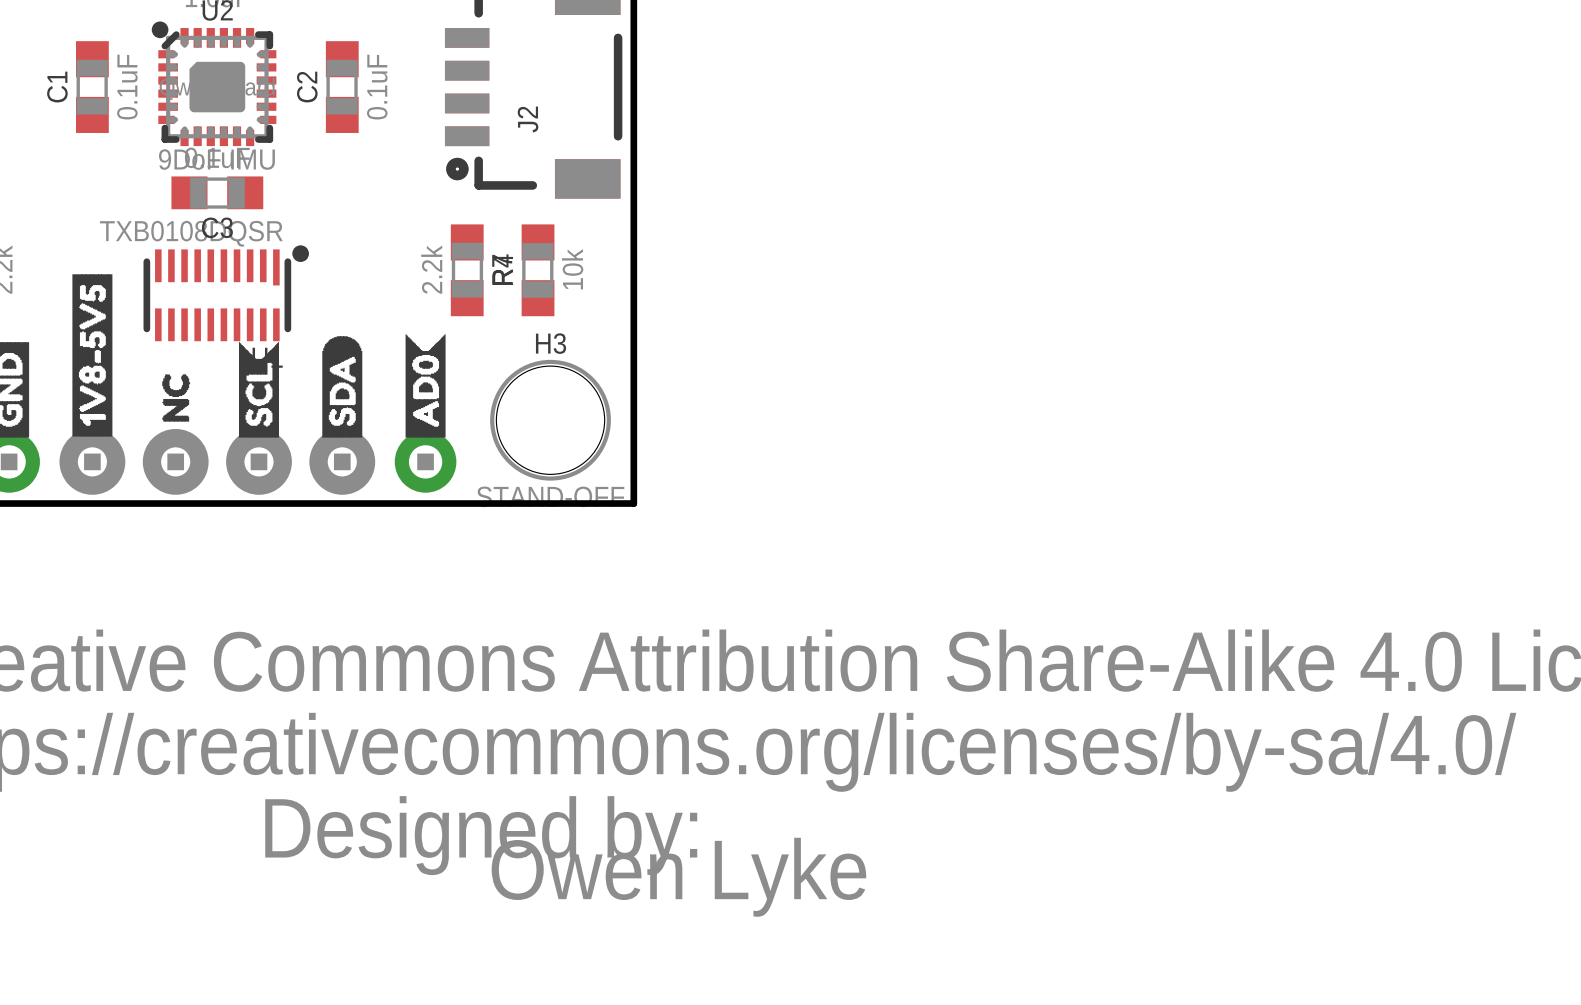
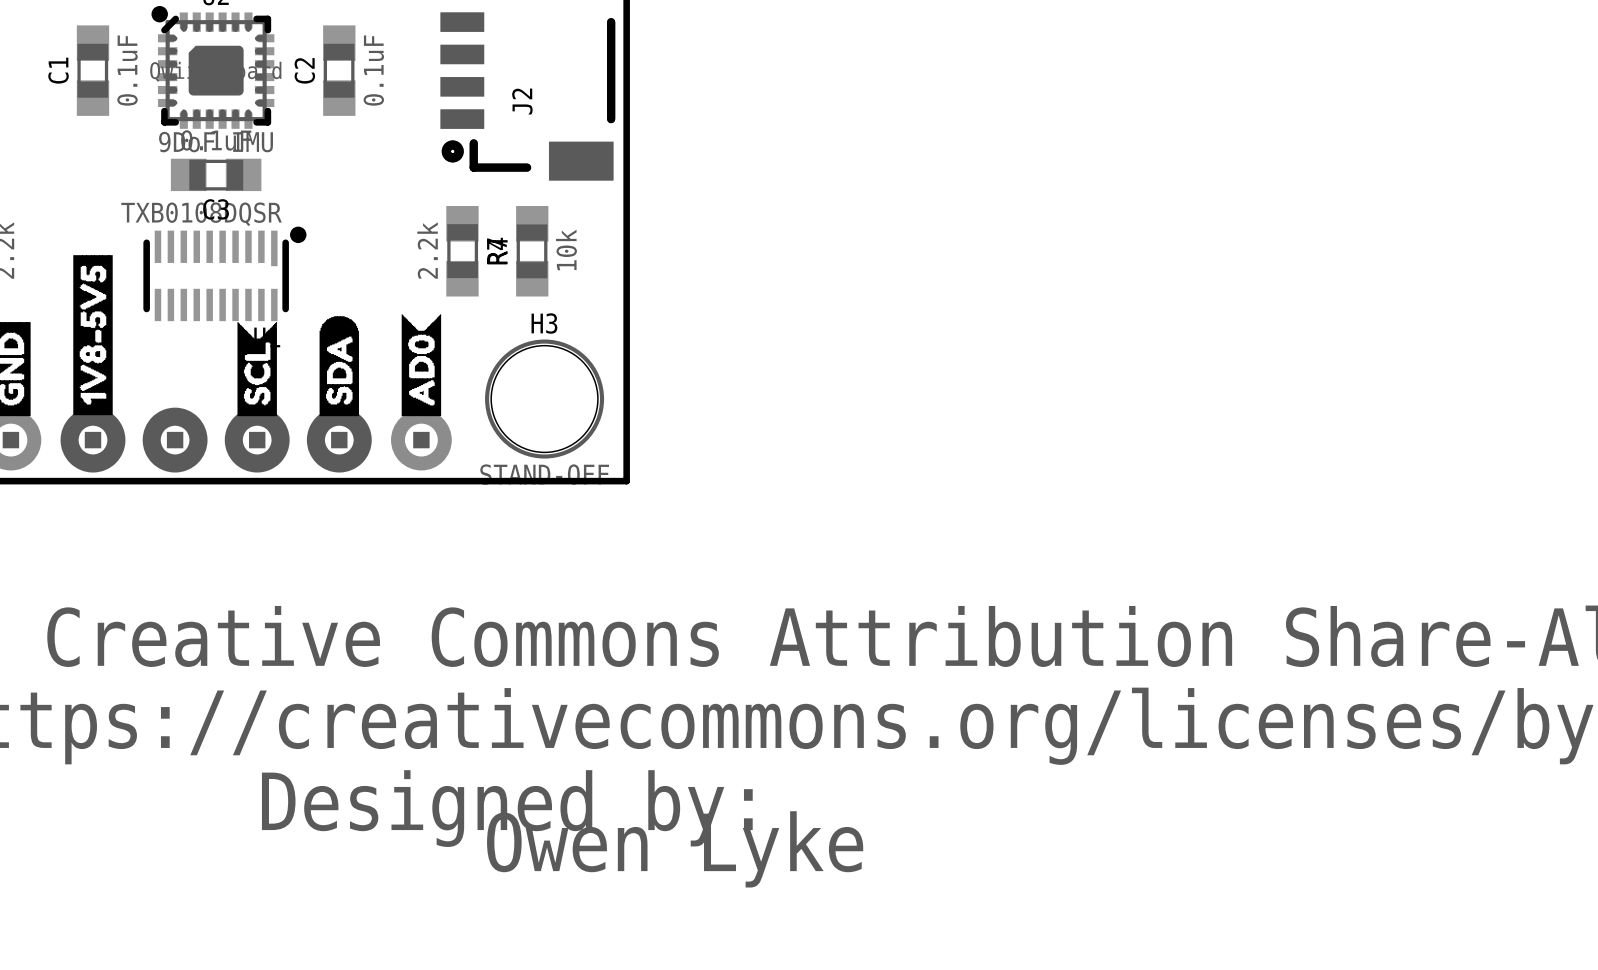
drawing: [162, 374, 191, 422] -> none

